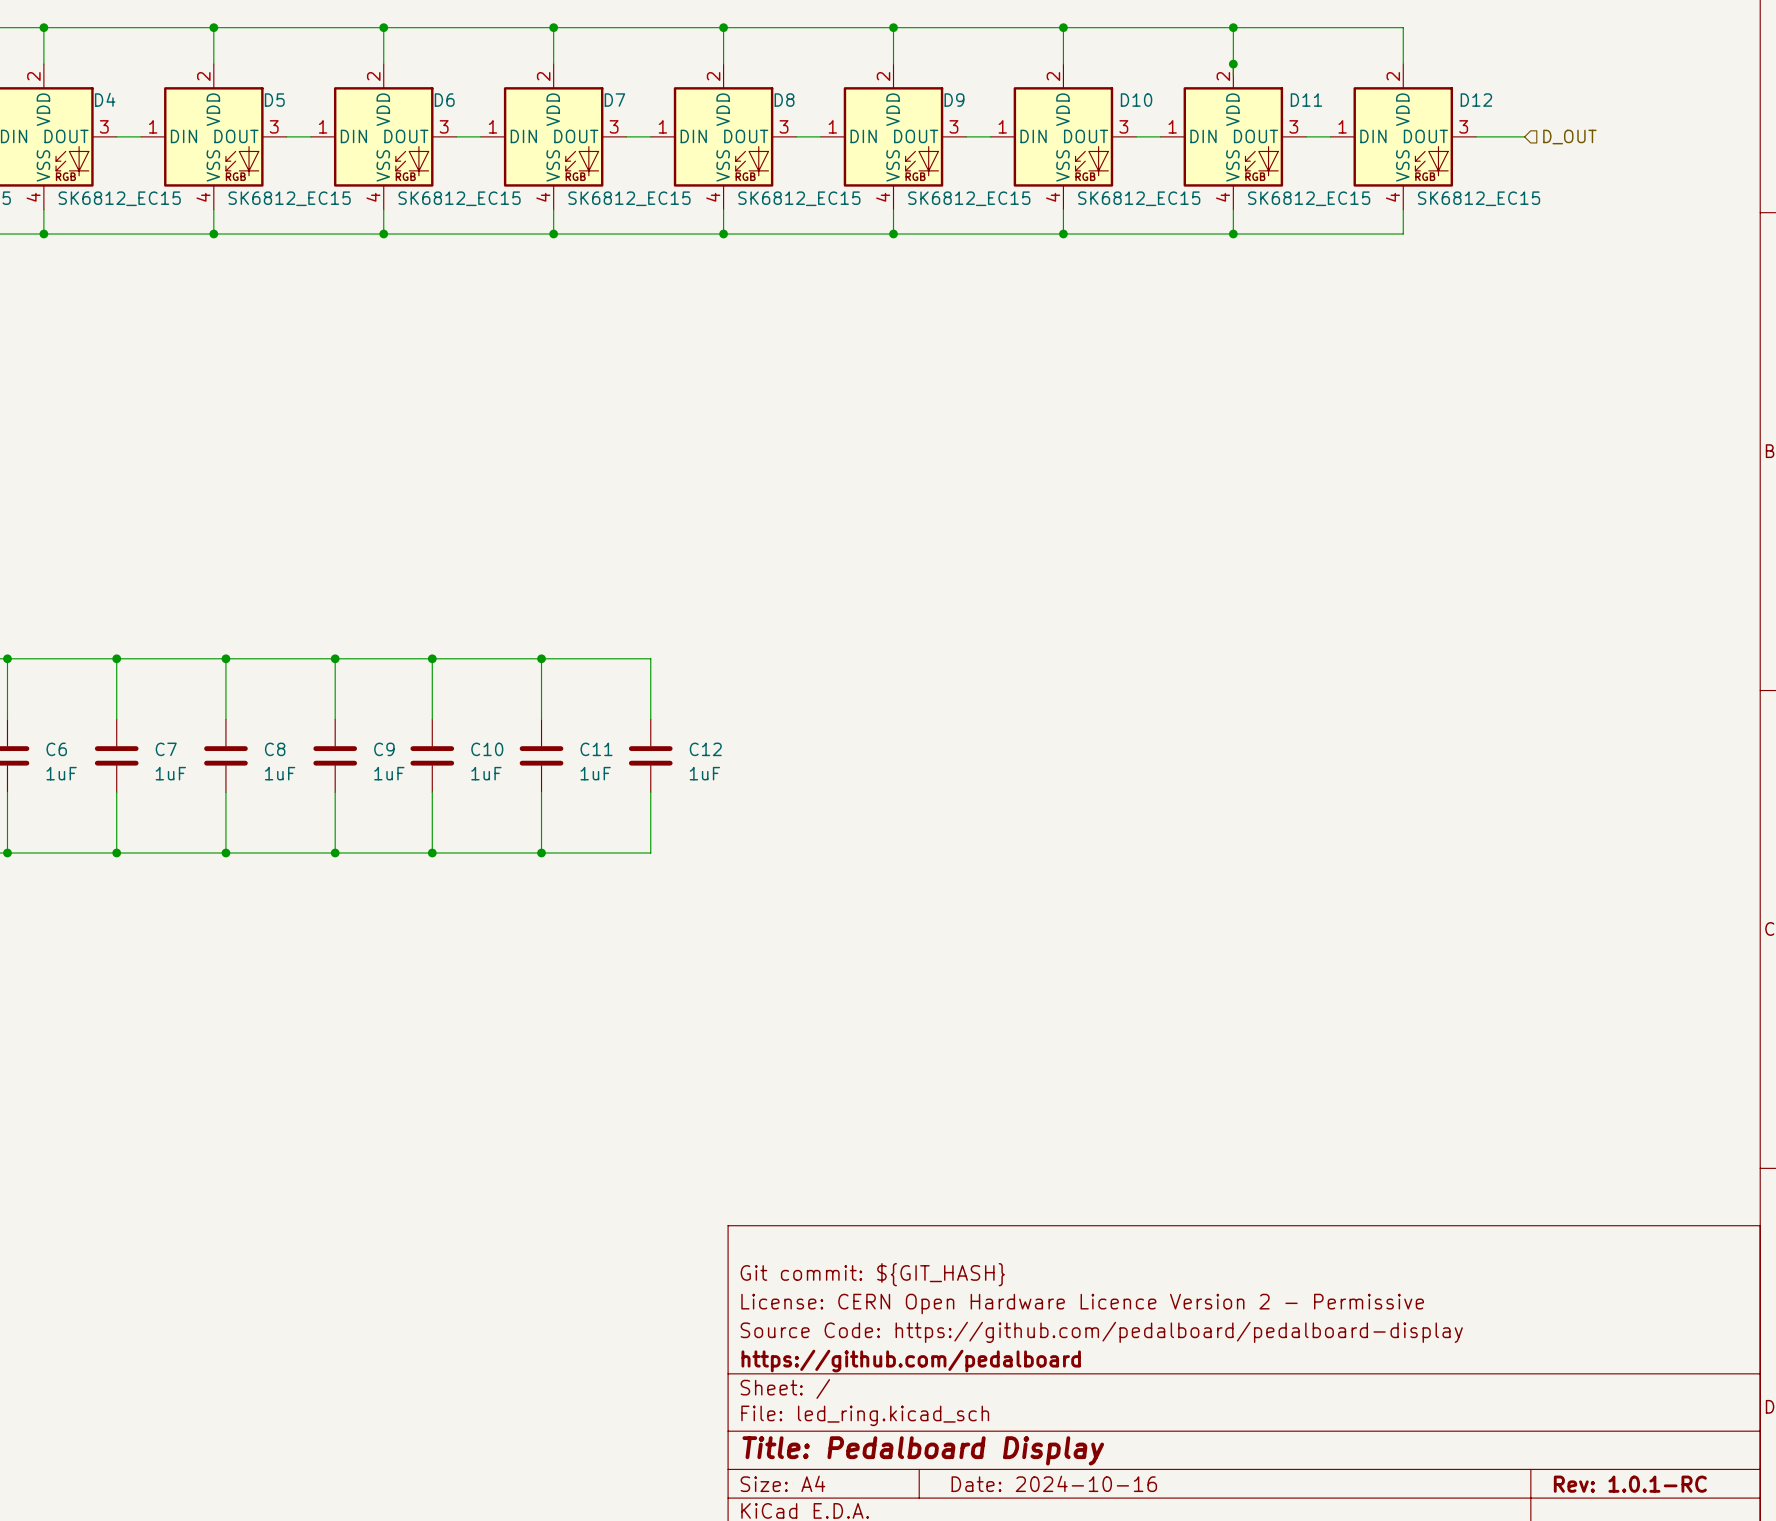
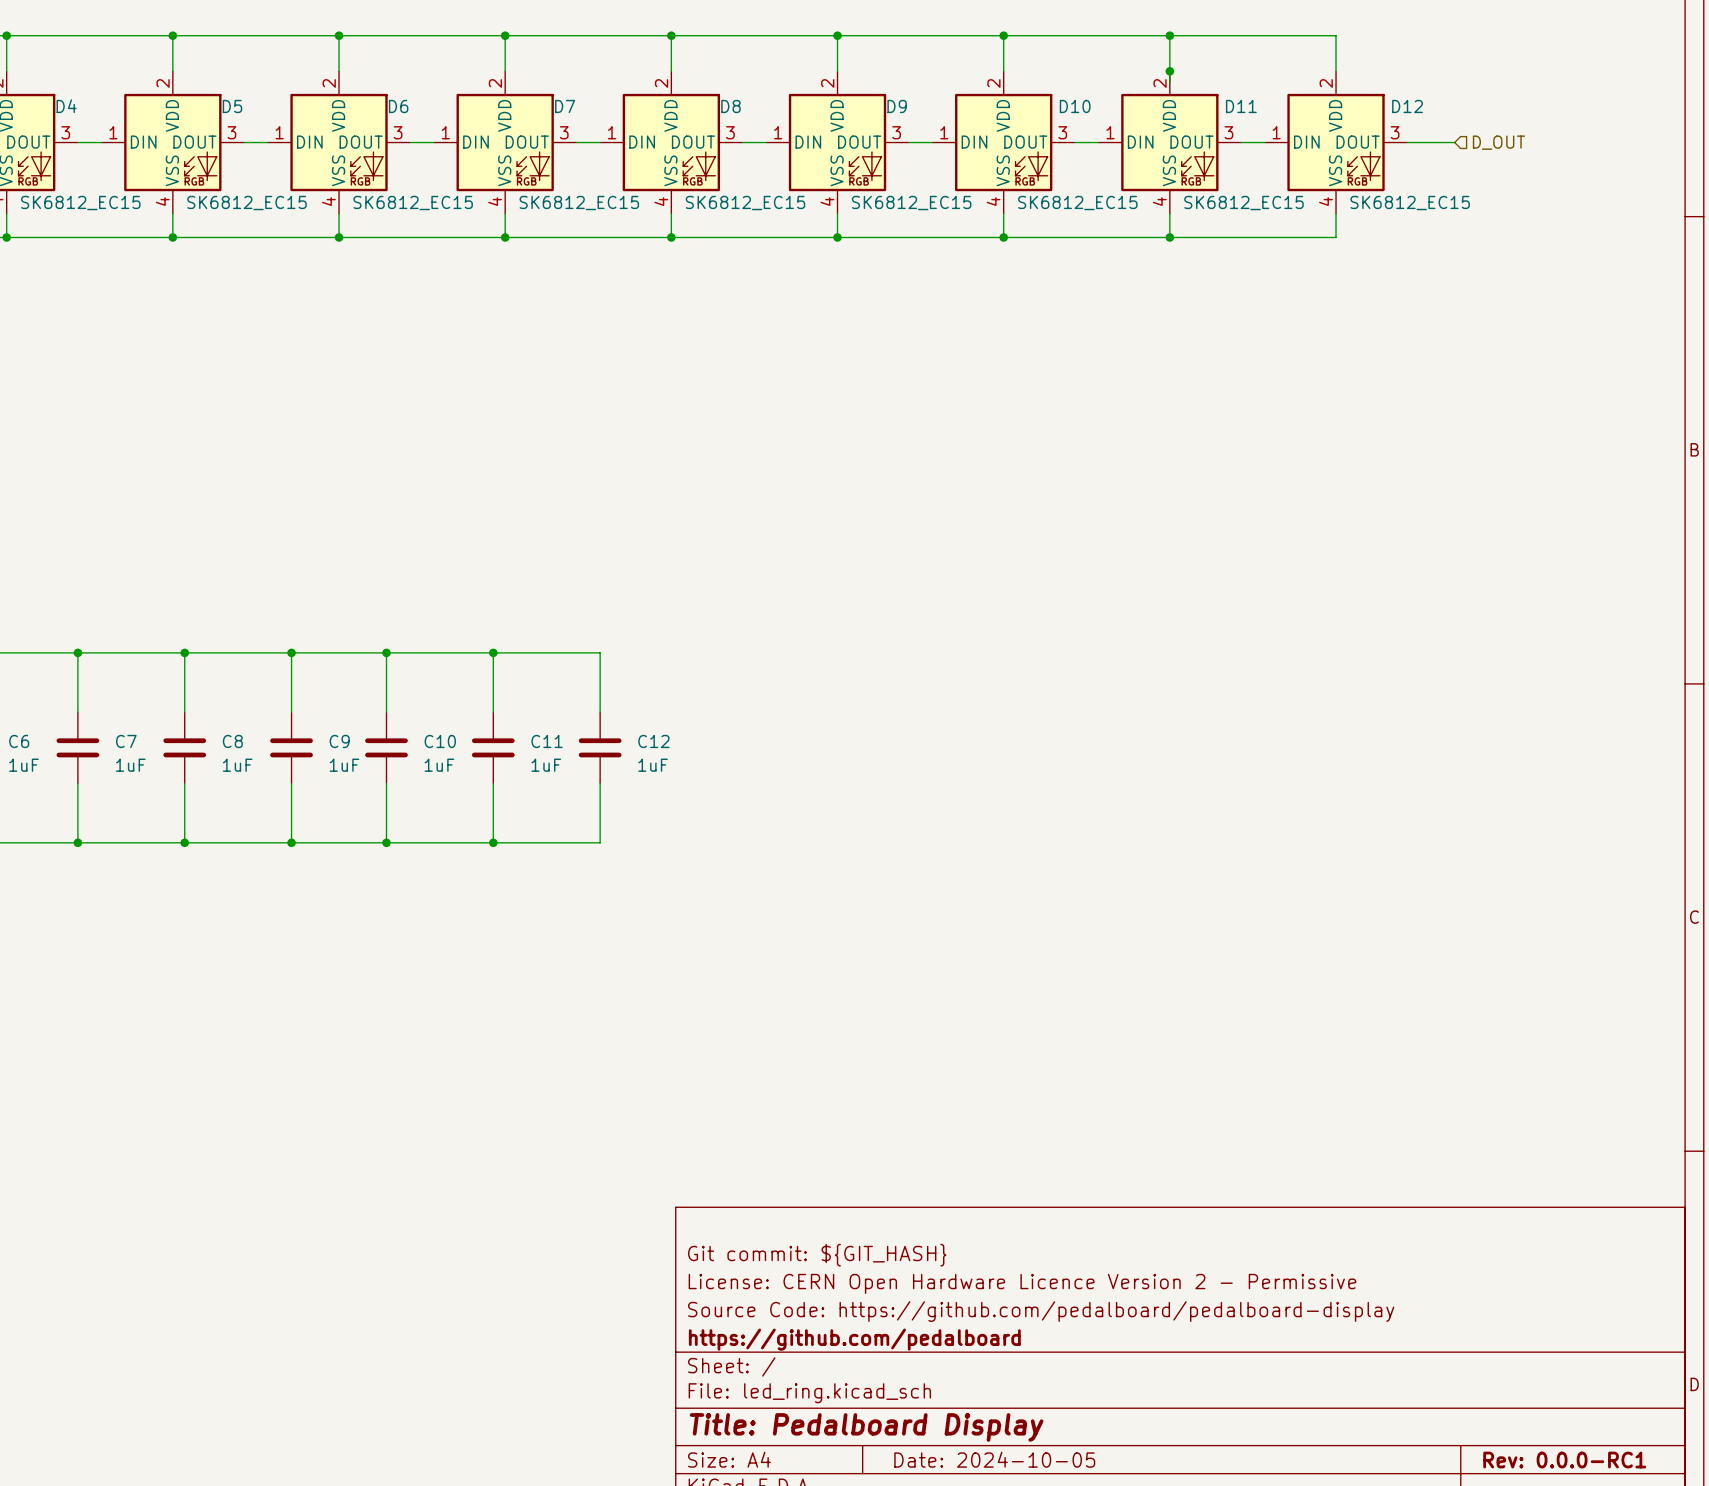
title block: Date: 2024-10-16 (1054, 1483) -> Date: 2024-10-05 (994, 1459)
title block: Rev: 1.0.1-RC (1630, 1484) -> Rev: 0.0.0-RC1 (1564, 1460)

